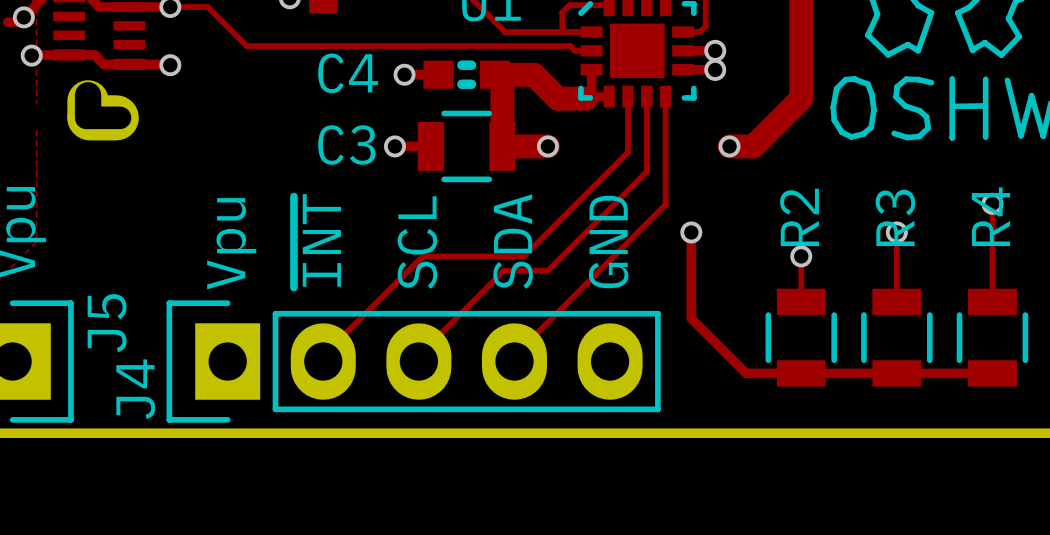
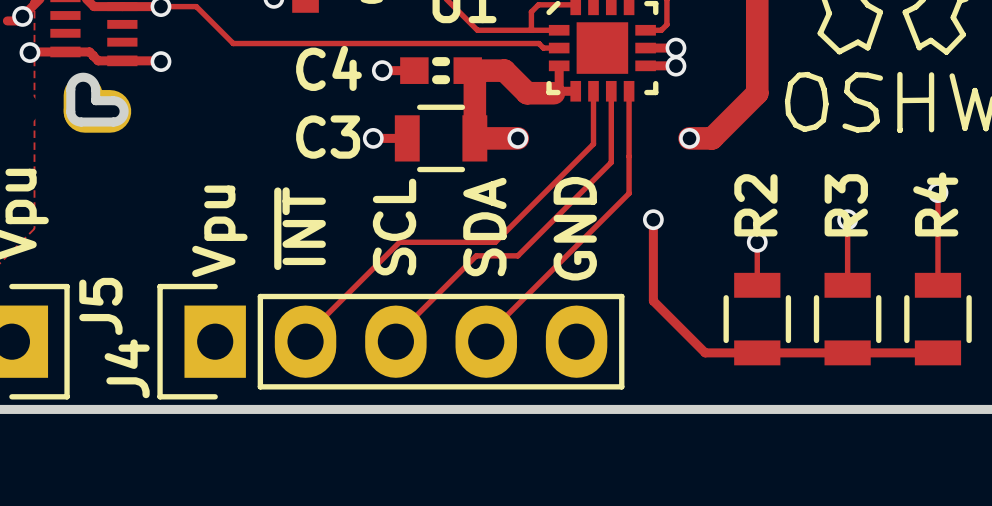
board edge: none -> (112, 100) (95, 100) (95, 88) (92, 80) (83, 77) (75, 79) (70, 88) (70, 113) (73, 119) (81, 122)
board edge: none -> (113, 100) (119, 102) (123, 108) (123, 115) (118, 120) (81, 122)

